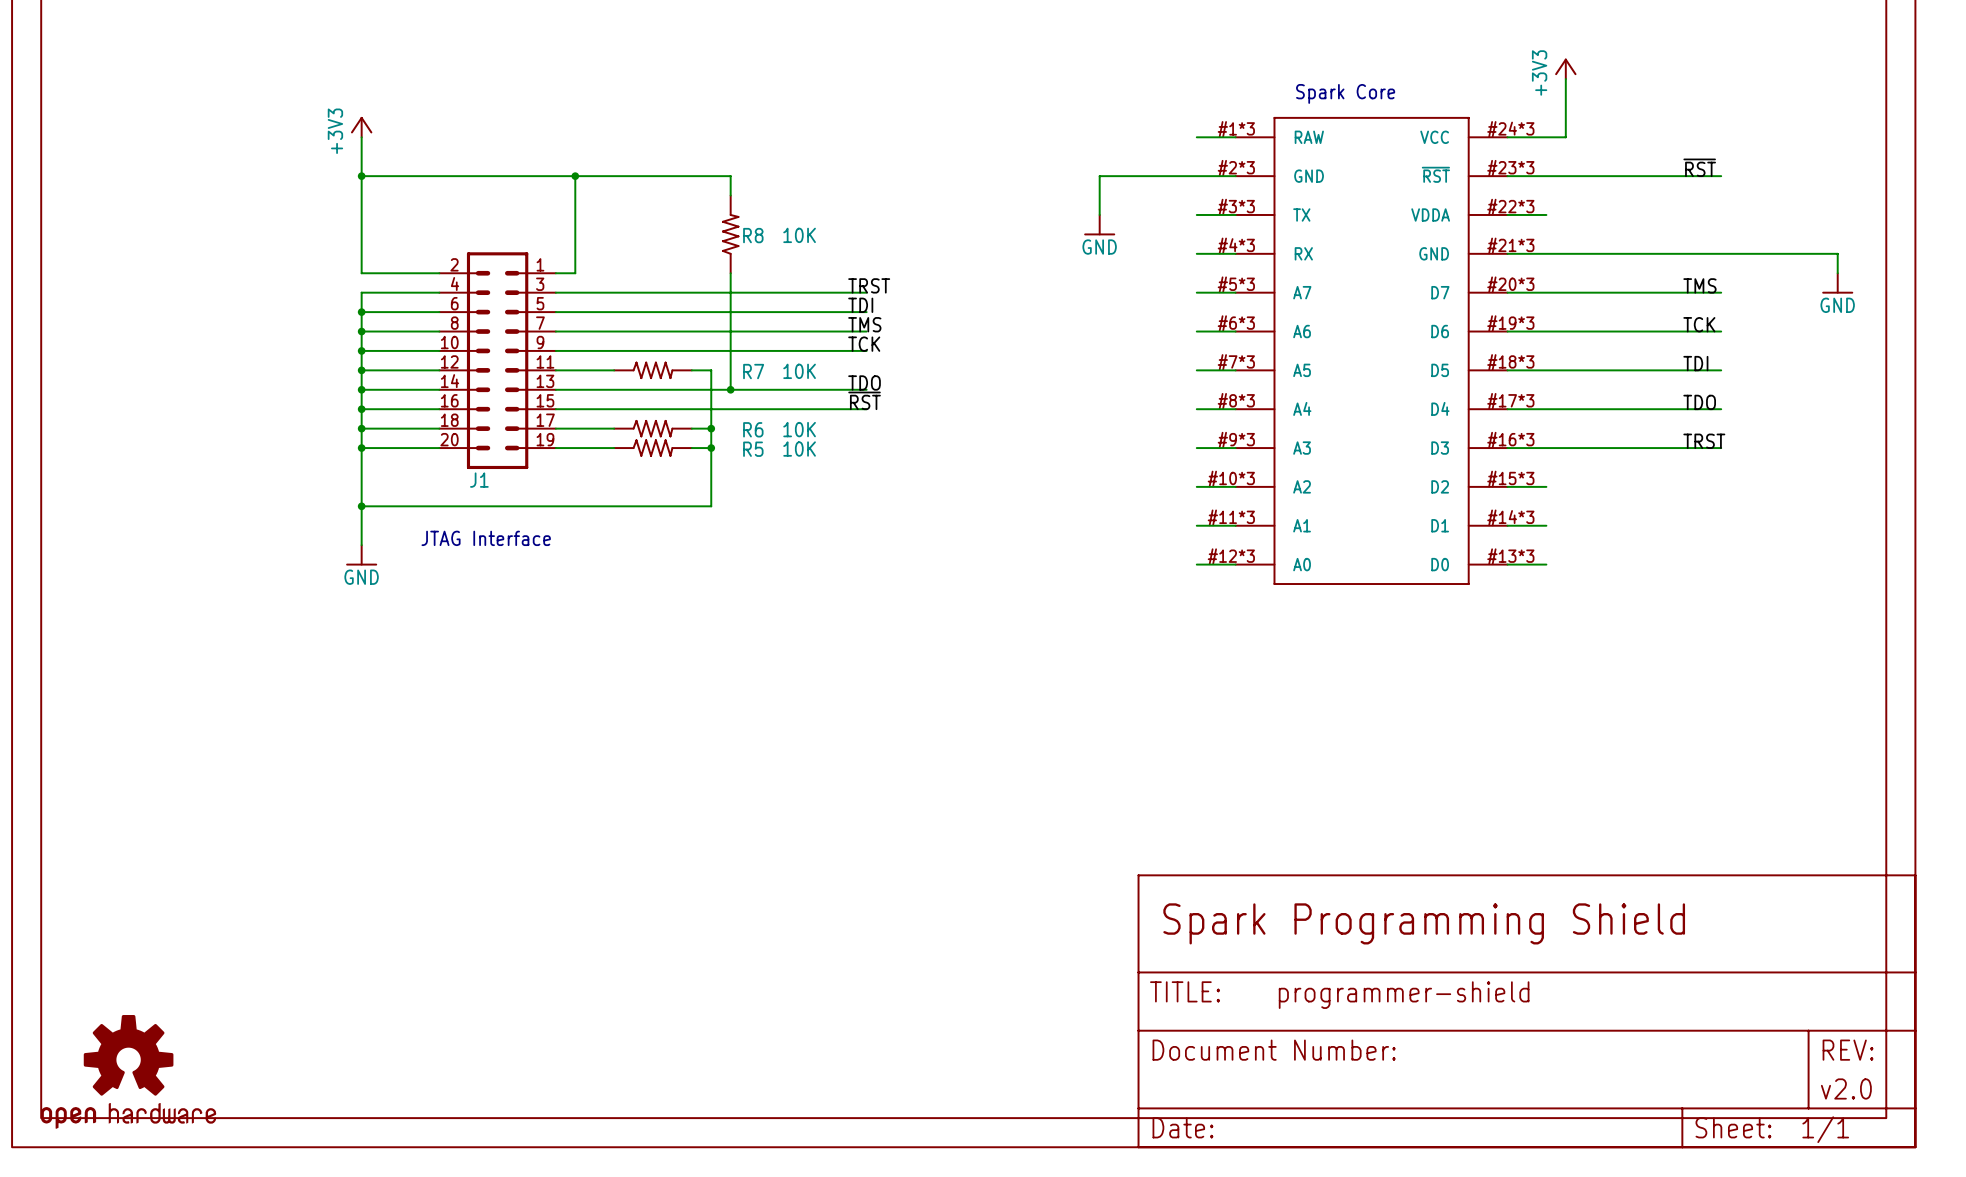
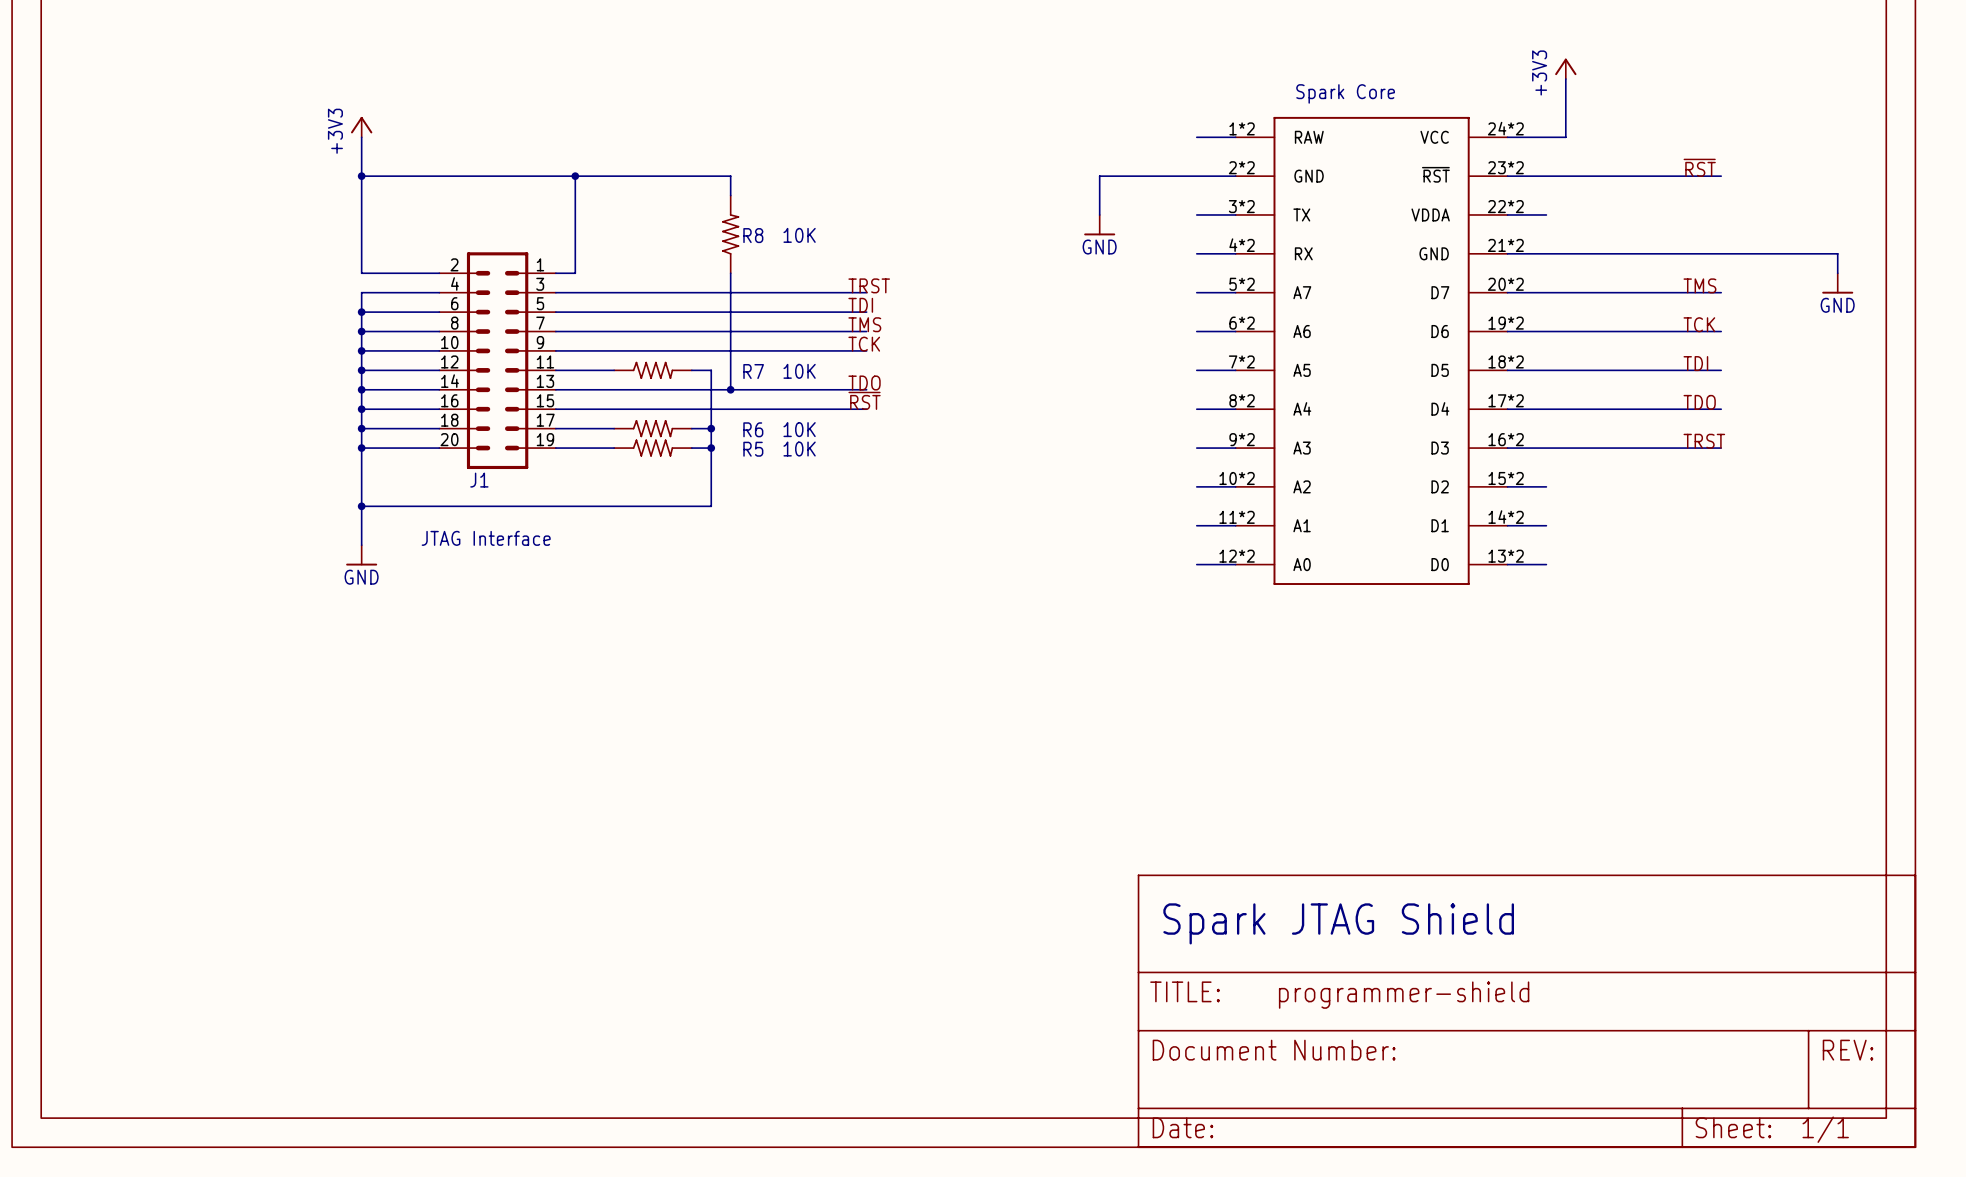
part symbol: [1235, 116, 1508, 585] -> [1235, 116, 1508, 585]
text: Spark Programming Shield (1424, 923) -> Spark JTAG Shield (1338, 923)
part: (128, 1071) -> none
text: v2.0 (1846, 1088) -> none

